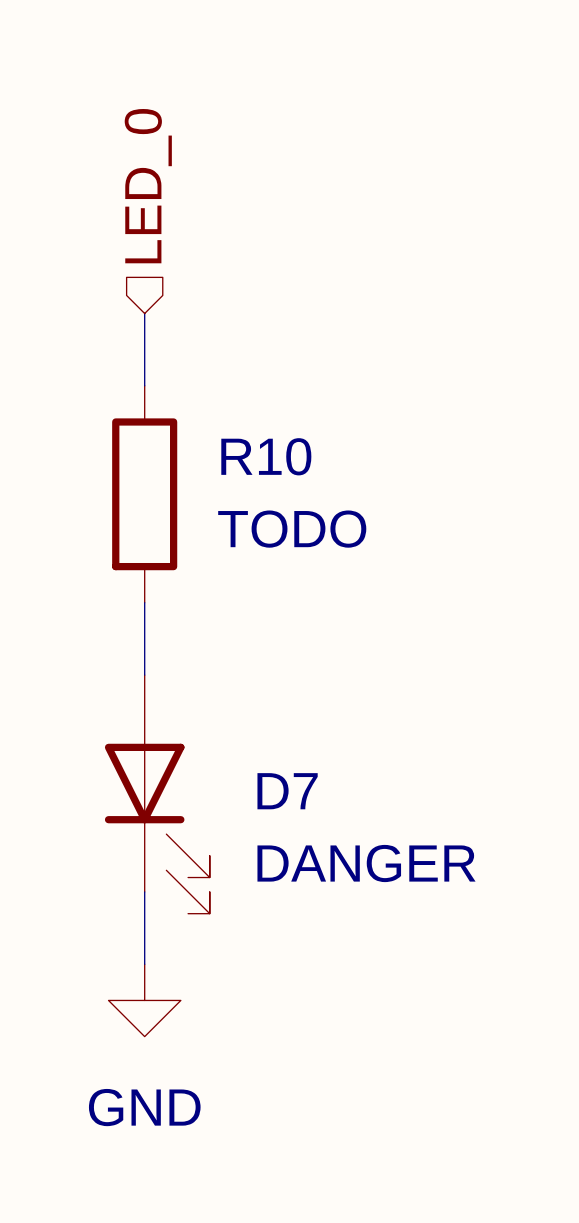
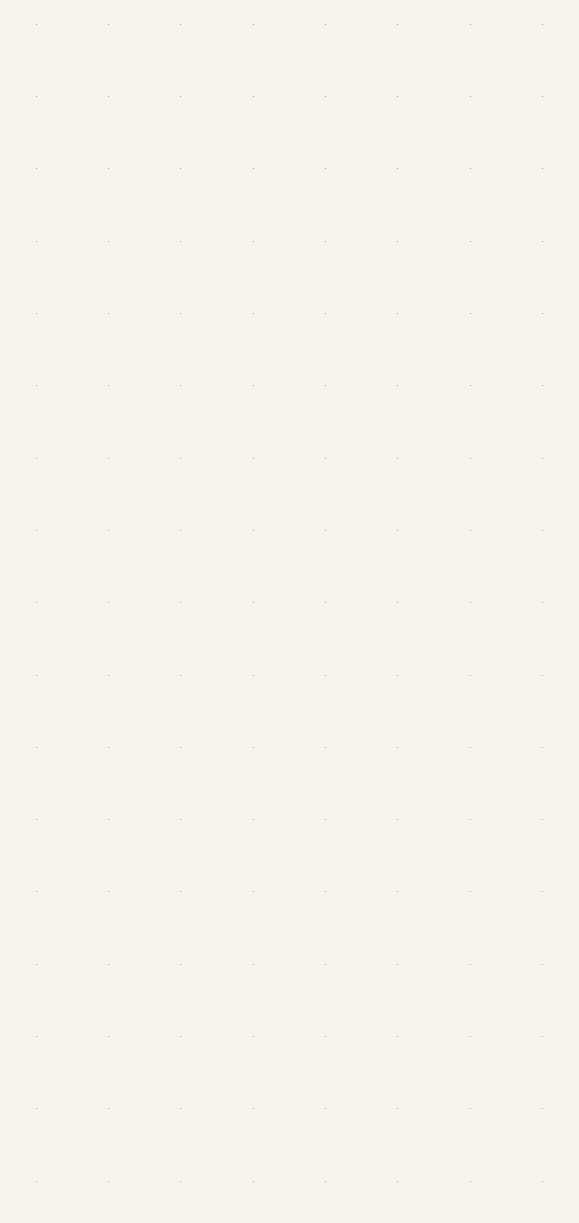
hierarchical label: LED_0 (148, 186) -> none
wire: (144, 313) (144, 385) -> none
R10: TODO (144, 494) -> none
wire: (144, 602) (144, 675) -> none
D7: DANGER (157, 794) -> none
wire: (144, 891) (144, 964) -> none
power symbol: GND (144, 1000) -> none

